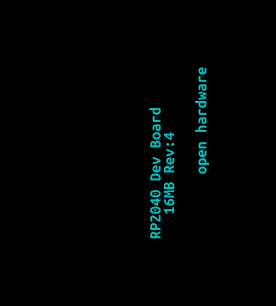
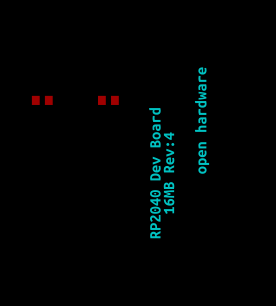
part: none -> (42, 100)
part: none -> (108, 100)

